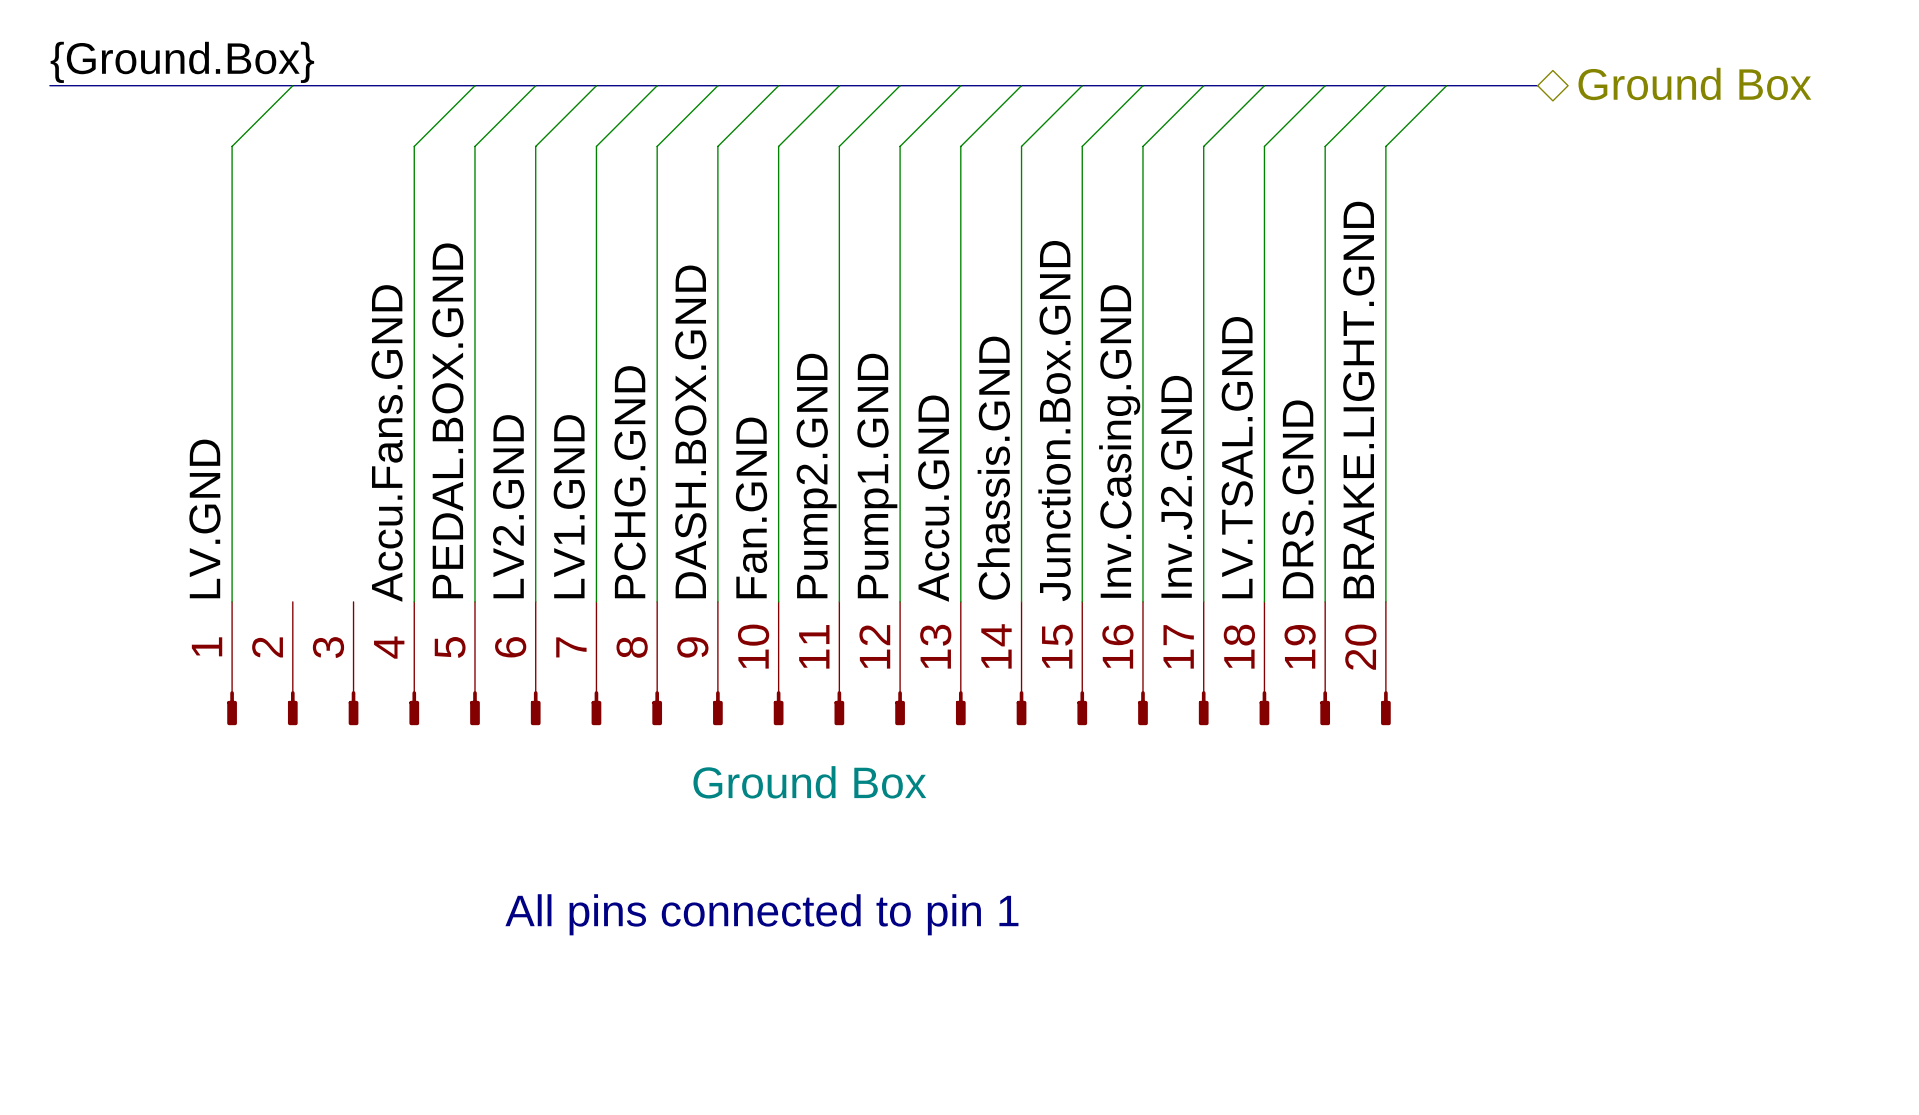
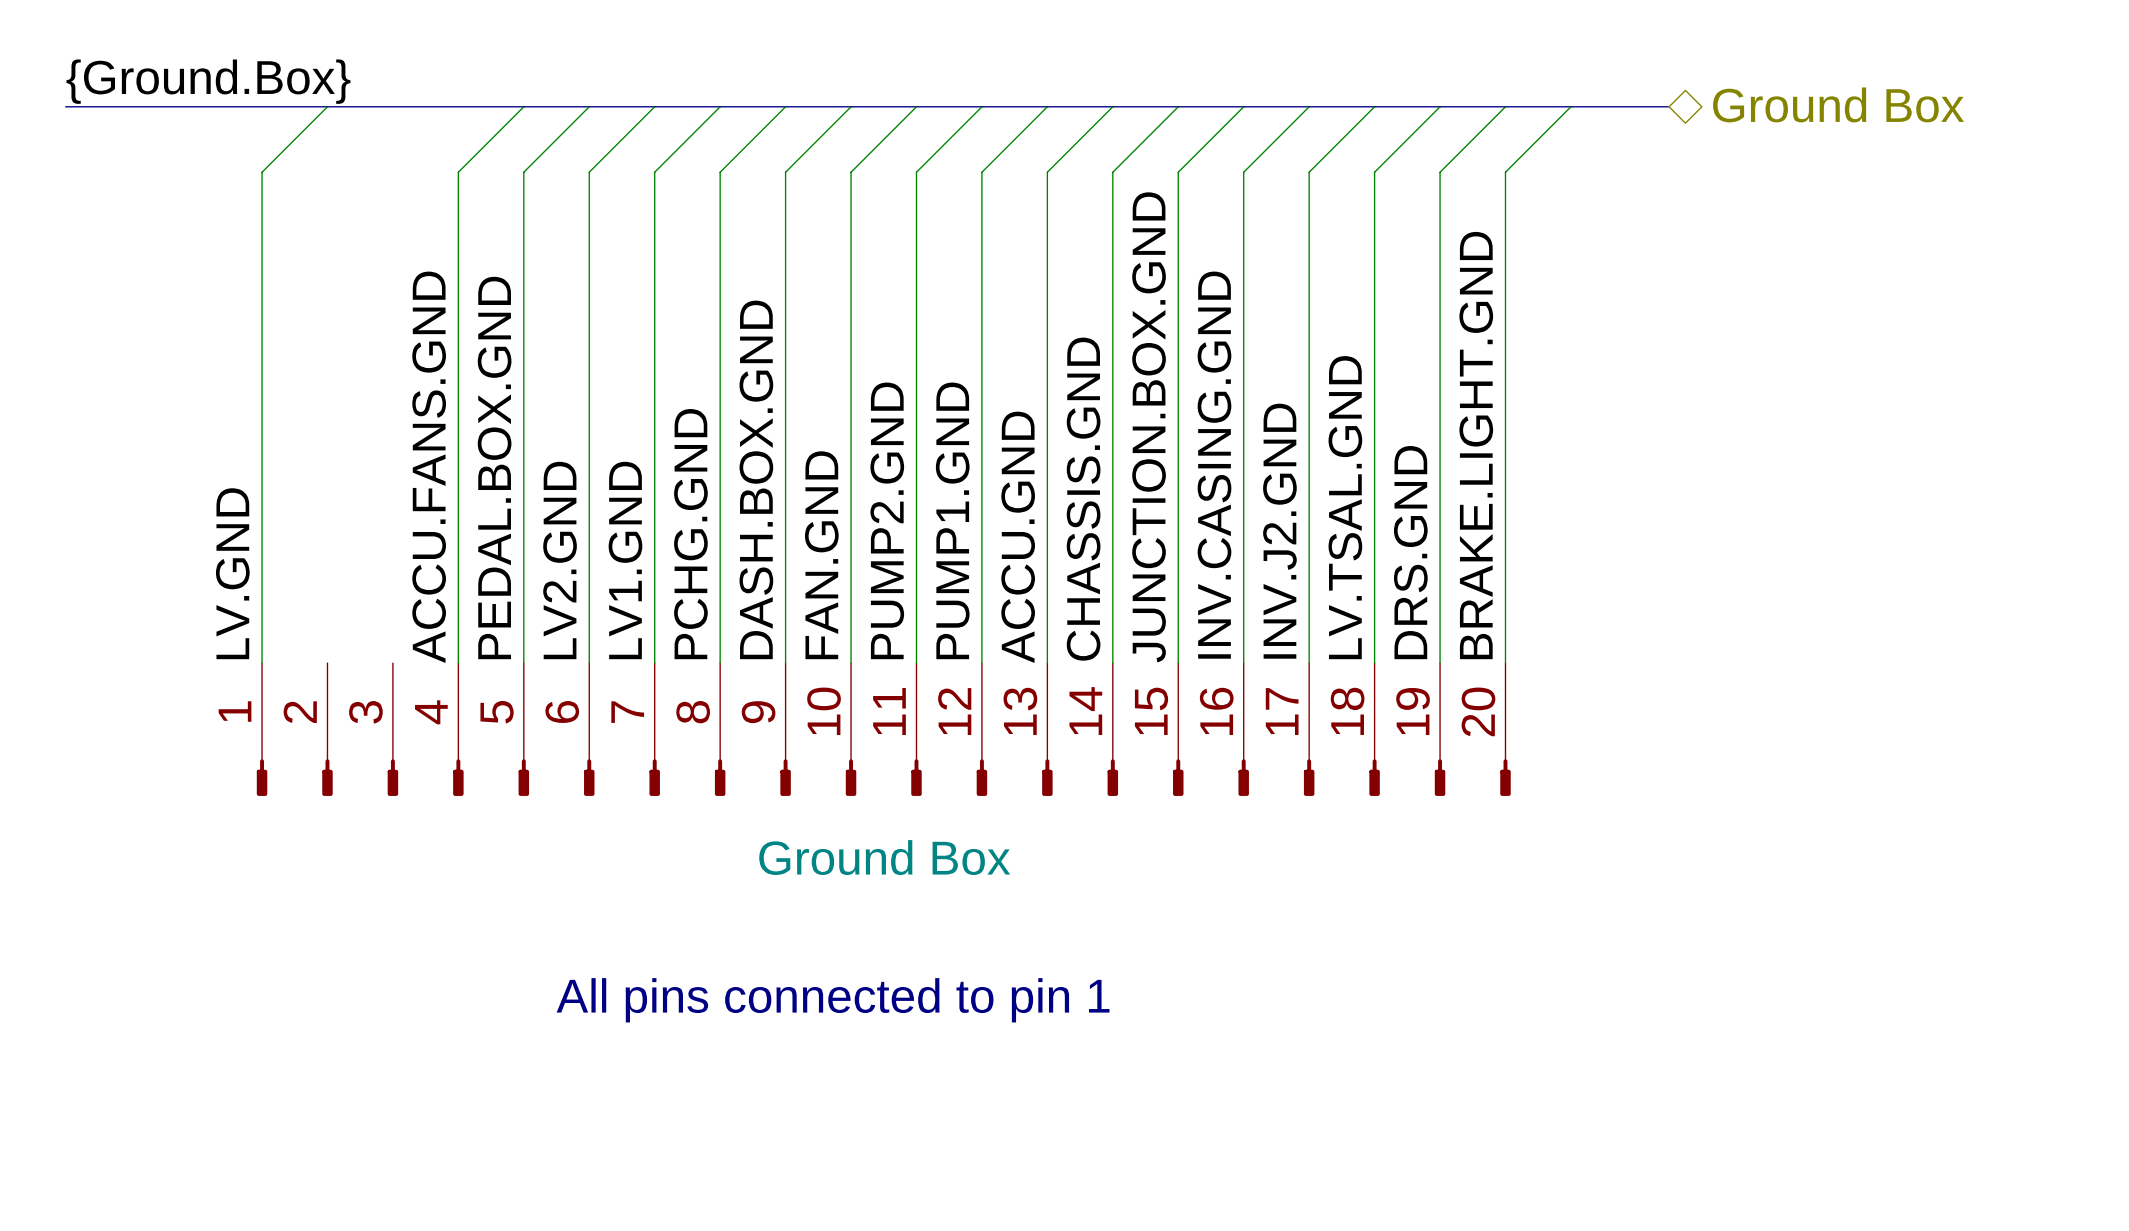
label: Junction.Box.GND (1054, 421) -> JUNCTION.BOX.GND (1149, 427)
label: Inv.Casing.GND (1119, 441) -> INV.CASING.GND (1214, 465)
label: Accu.Fans.GND (387, 443) -> ACCU.FANS.GND (429, 467)
label: Chassis.GND (993, 468) -> CHASSIS.GND (1083, 499)
label: Pump2.GND (816, 476) -> PUMP2.GND (887, 520)
label: Pump1.GND (877, 476) -> PUMP1.GND (952, 520)
label: Inv.J2.GND (1176, 486) -> INV.J2.GND (1279, 531)
label: Accu.GND (933, 498) -> ACCU.GND (1018, 537)
label: Fan.GND (751, 507) -> FAN.GND (821, 555)

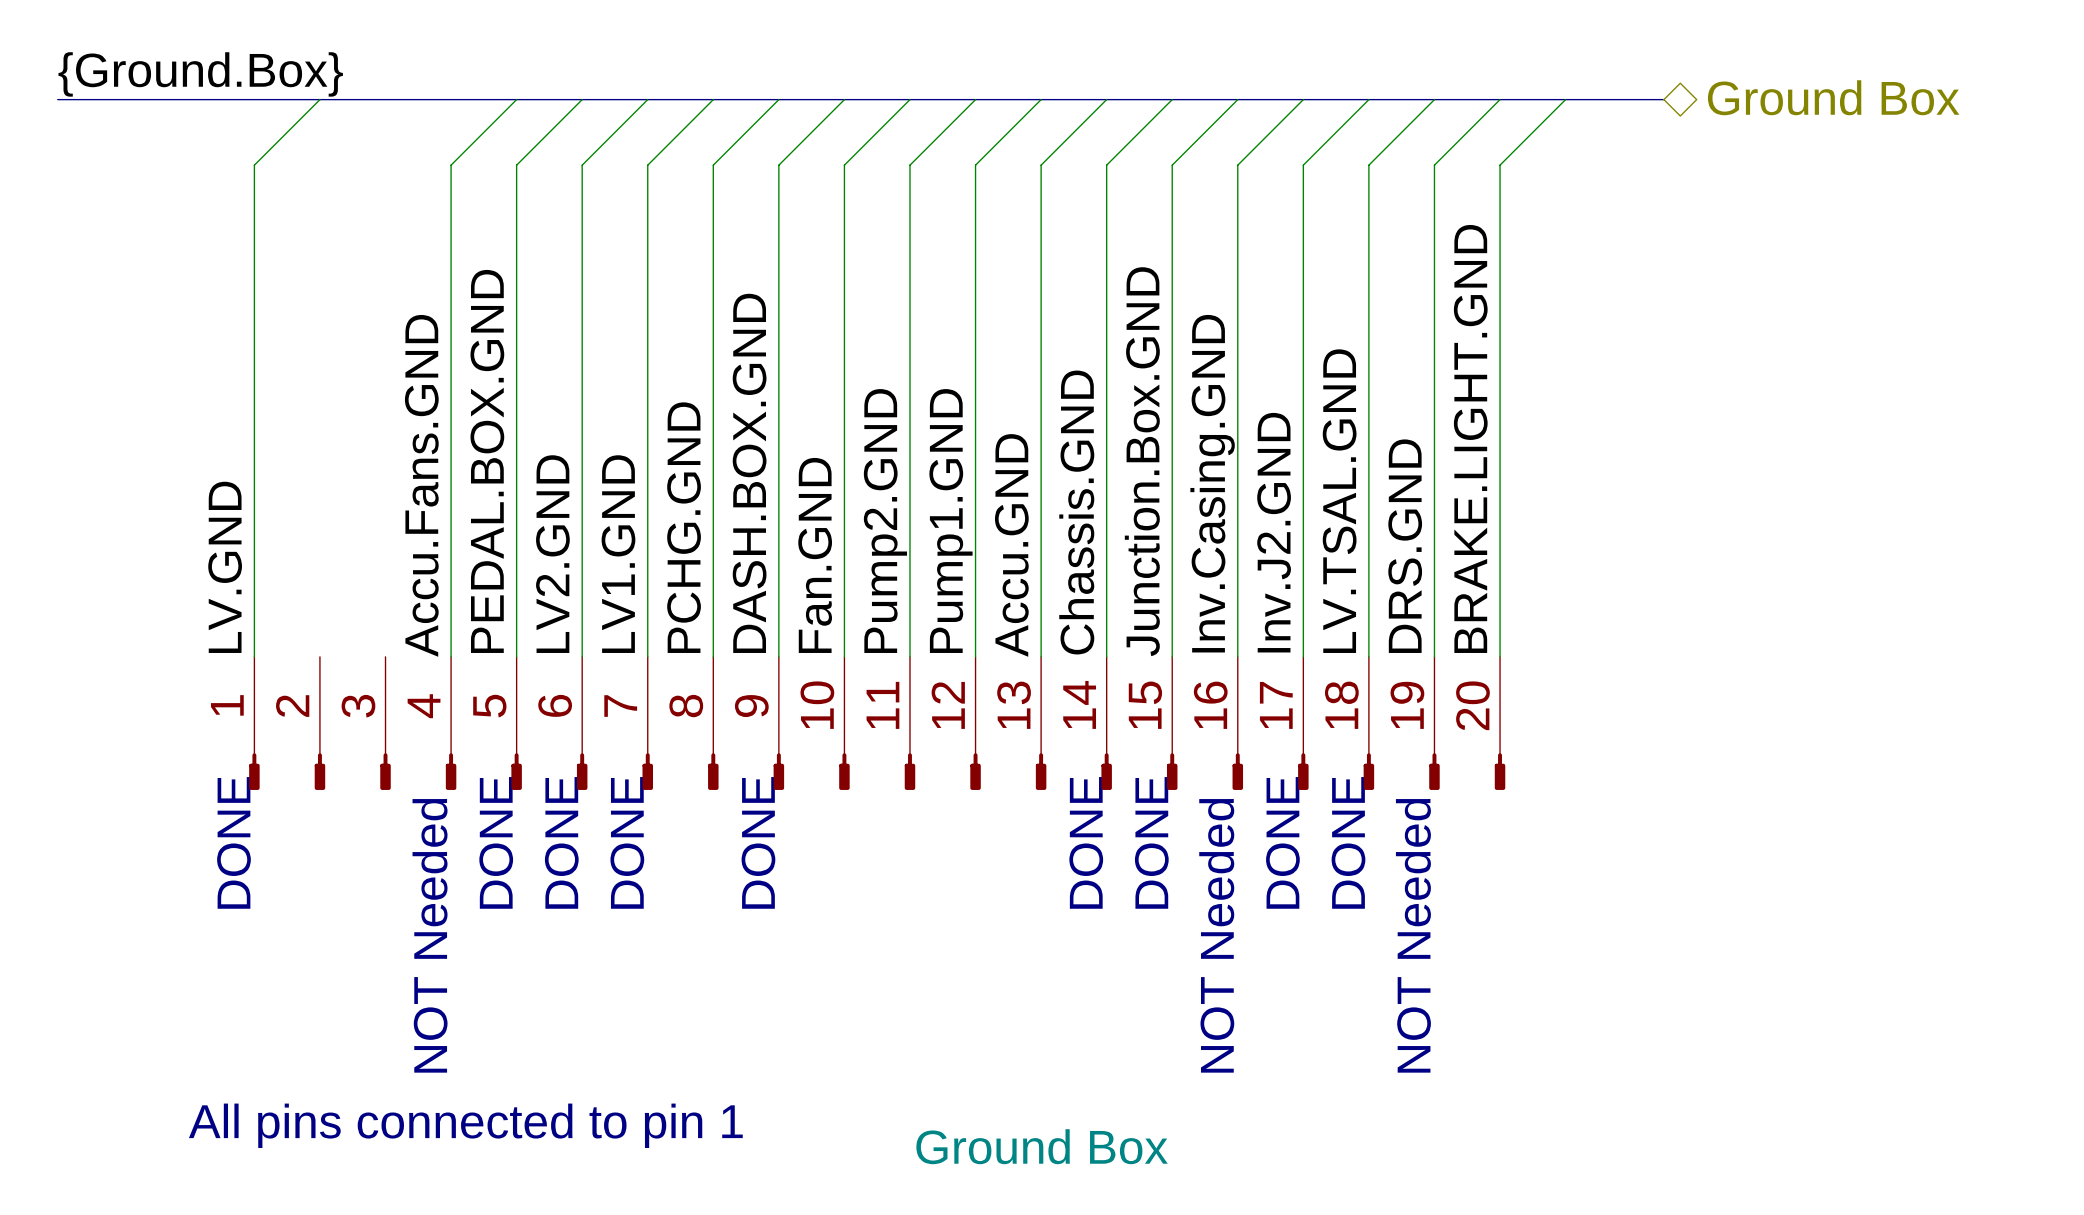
label: JUNCTION.BOX.GND (1149, 427) -> Junction.Box.GND (1142, 461)
label: INV.CASING.GND (1214, 465) -> Inv.Casing.GND (1212, 483)
label: ACCU.FANS.GND (429, 467) -> Accu.Fans.GND (421, 485)
label: CHASSIS.GND (1083, 499) -> Chassis.GND (1076, 512)
label: PUMP2.GND (887, 520) -> Pump2.GND (885, 521)
label: PUMP1.GND (952, 520) -> Pump1.GND (950, 521)
label: INV.J2.GND (1279, 531) -> Inv.J2.GND (1274, 532)
label: ACCU.GND (1018, 537) -> Accu.GND (1011, 545)
label: FAN.GND (821, 555) -> Fan.GND (815, 555)
text: none -> DONE (233, 842)
text: none -> DONE (496, 842)
text: none -> DONE (561, 842)
text: none -> DONE (627, 842)
text: none -> DONE (758, 842)
text: none -> DONE (1086, 842)
text: none -> DONE (1151, 842)
text: none -> DONE (1282, 842)
text: none -> DONE (1348, 842)
part value position: Ground Box (884, 857) -> Ground Box (1042, 1146)
text: none -> NOT Needed (430, 935)
text: none -> NOT Needed (1216, 935)
text: none -> NOT Needed (1413, 935)
text position: All pins connected to pin 1 (833, 1000) -> All pins connected to pin 1 (465, 1125)

